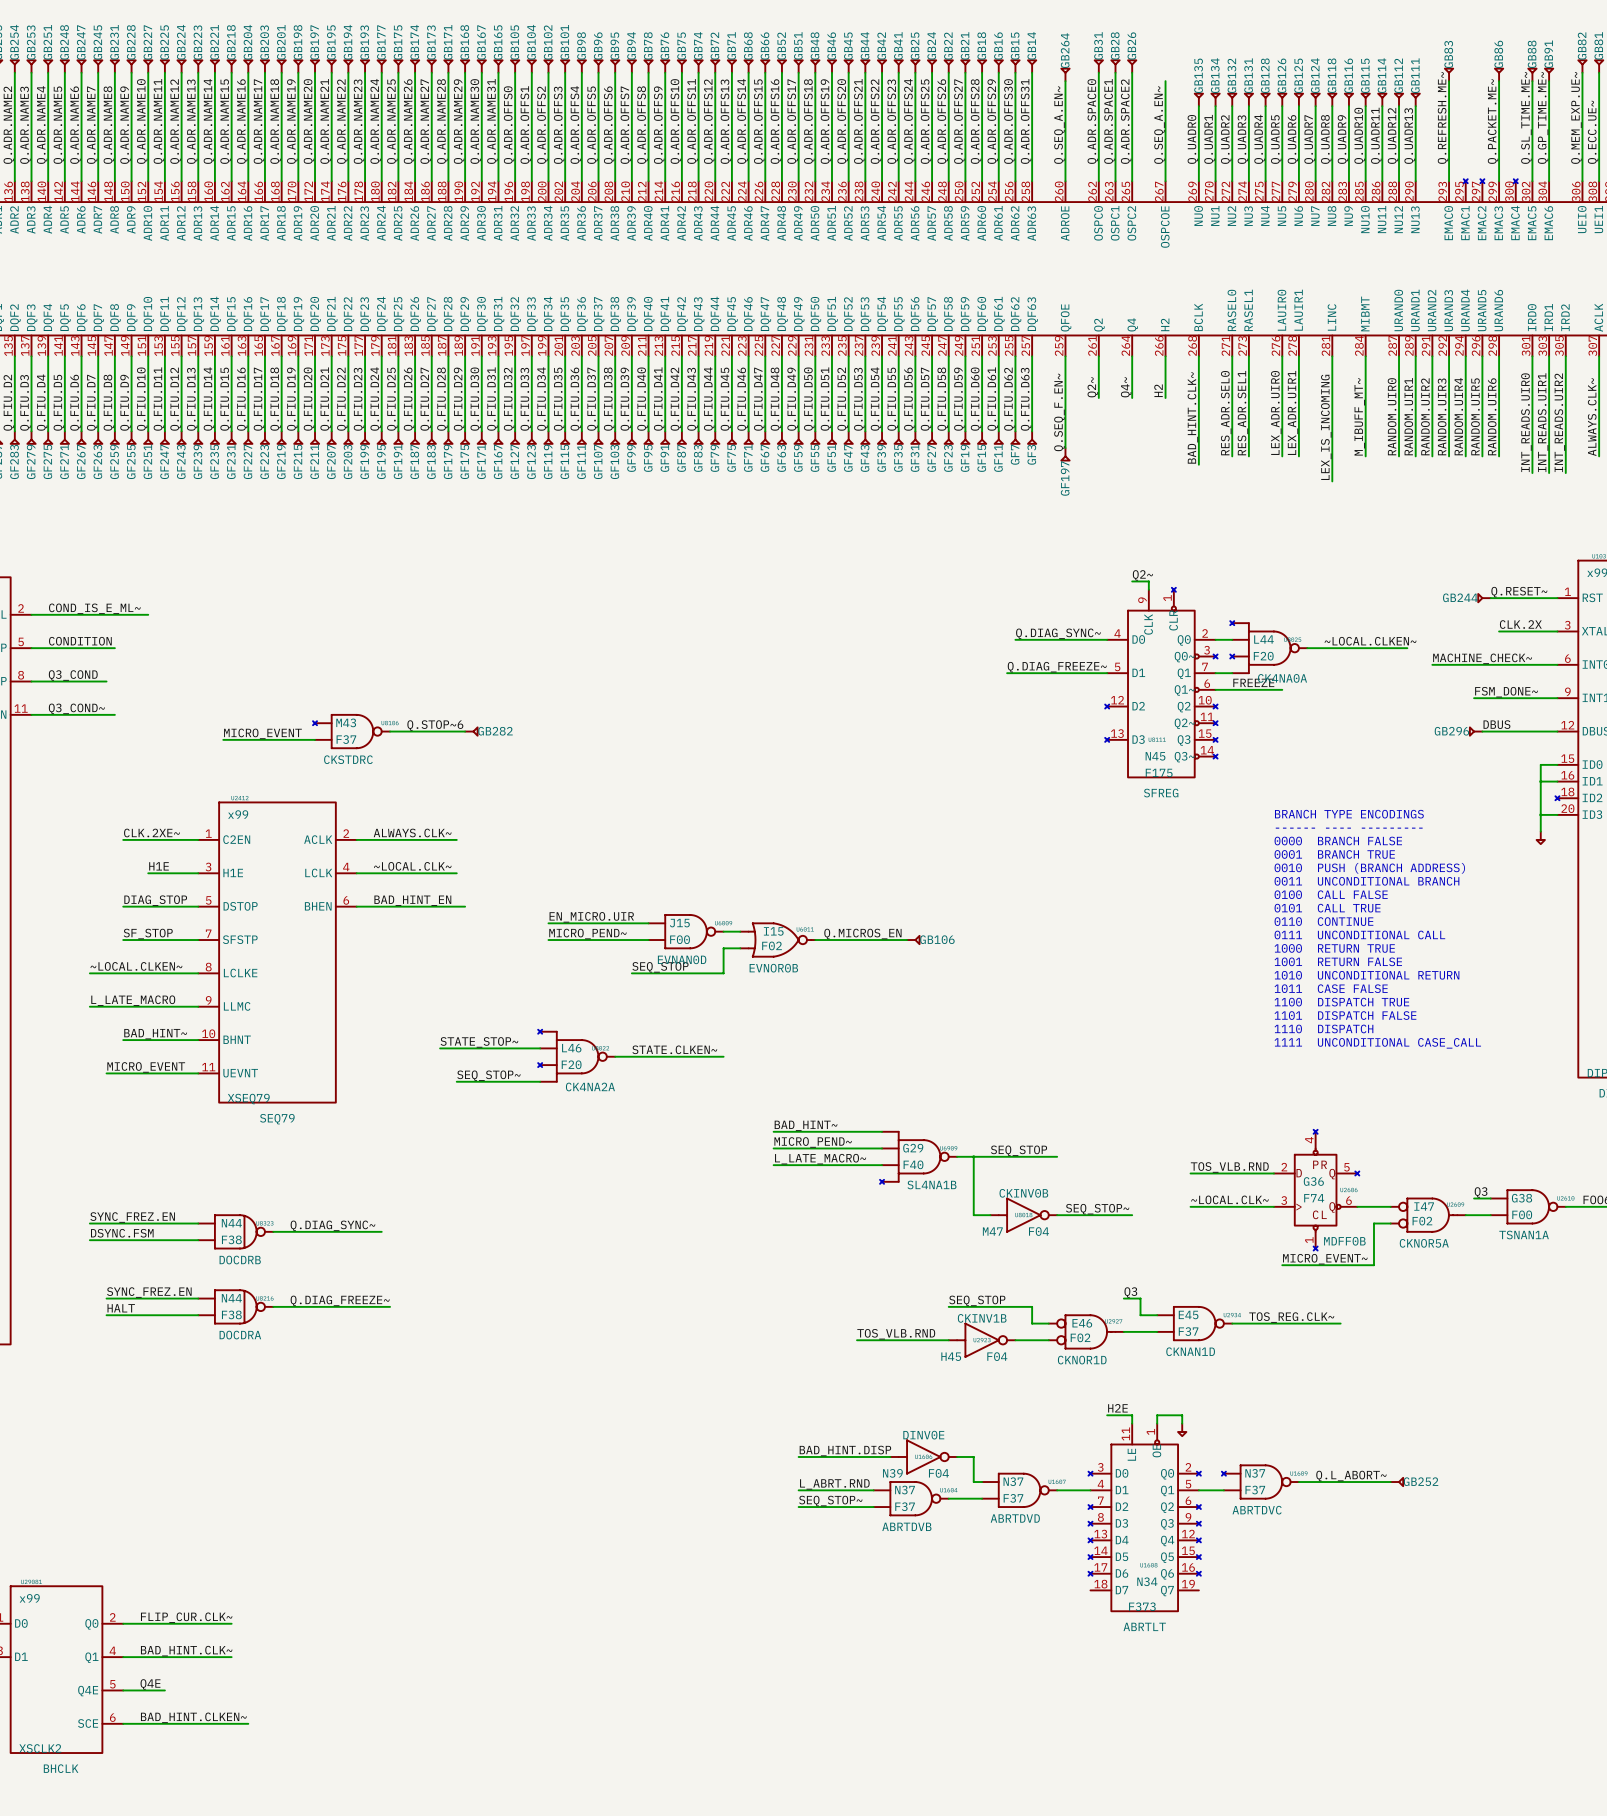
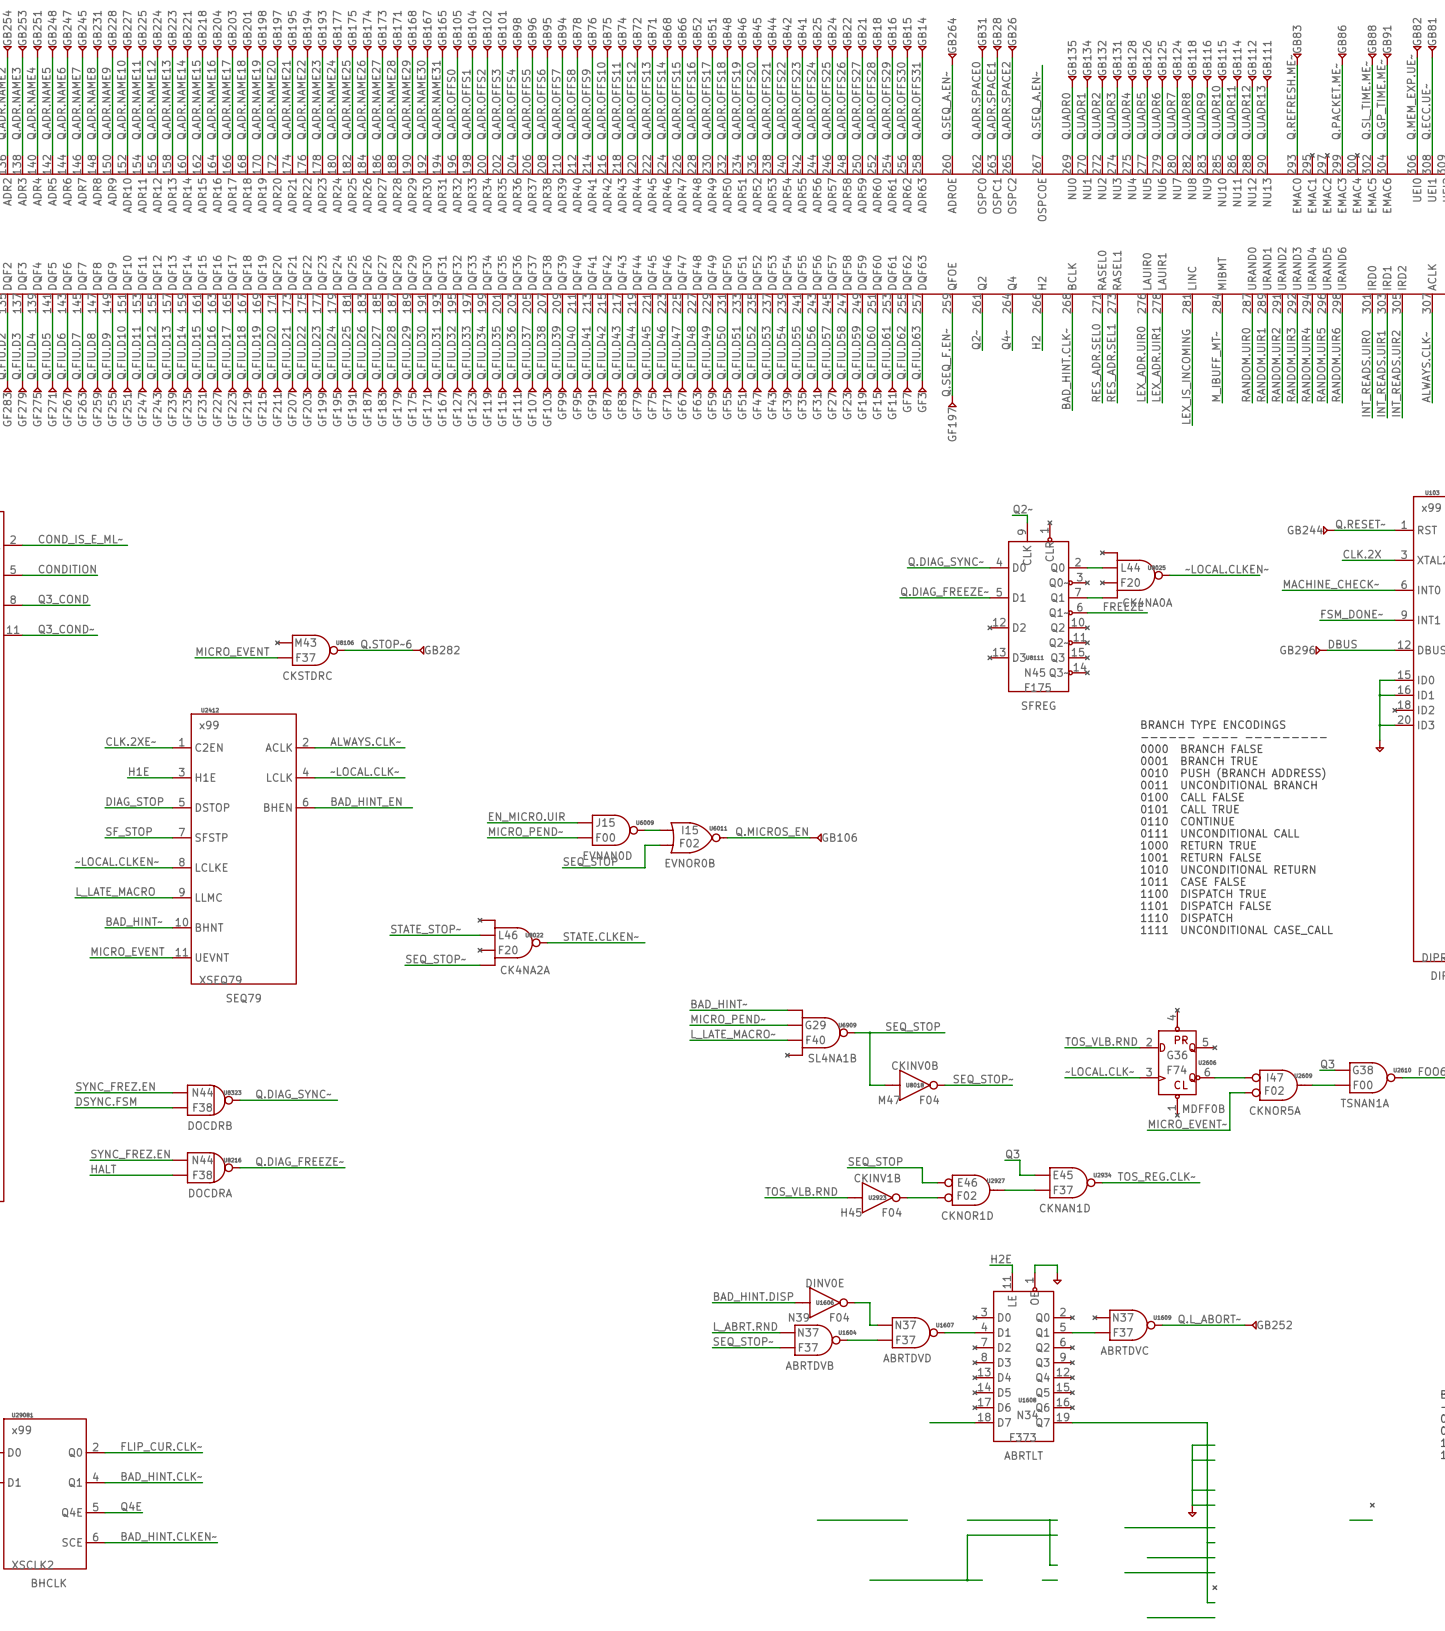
wire: none -> (929, 1422) (974, 1422)
wire: none -> (1072, 1422) (1207, 1422) (1207, 1602) (1214, 1602)
wire: none -> (1214, 1445) (1192, 1445) (1192, 1505) (1214, 1505)
wire: none -> (1192, 1460) (1214, 1460)
wire: none -> (1192, 1490) (1214, 1490)
no-connect mark: none -> (1372, 1505)
power symbol: none -> (1192, 1510)
wire: none -> (817, 1520) (907, 1520)
wire: none -> (967, 1520) (1057, 1520)
wire: none -> (1049, 1520) (1049, 1565) (1057, 1565)
wire: none -> (1349, 1520) (1372, 1520)
wire: none -> (1124, 1527) (1214, 1527)
wire: none -> (1057, 1535) (967, 1535) (967, 1580)
wire: none -> (1207, 1542) (1214, 1542)
wire: none -> (1147, 1557) (1214, 1557)
wire: none -> (1124, 1572) (1214, 1572)
wire: none -> (869, 1580) (982, 1580)
wire: none -> (1042, 1580) (1057, 1580)
no-connect mark: none -> (1214, 1587)
wire: none -> (1147, 1617) (1214, 1617)

